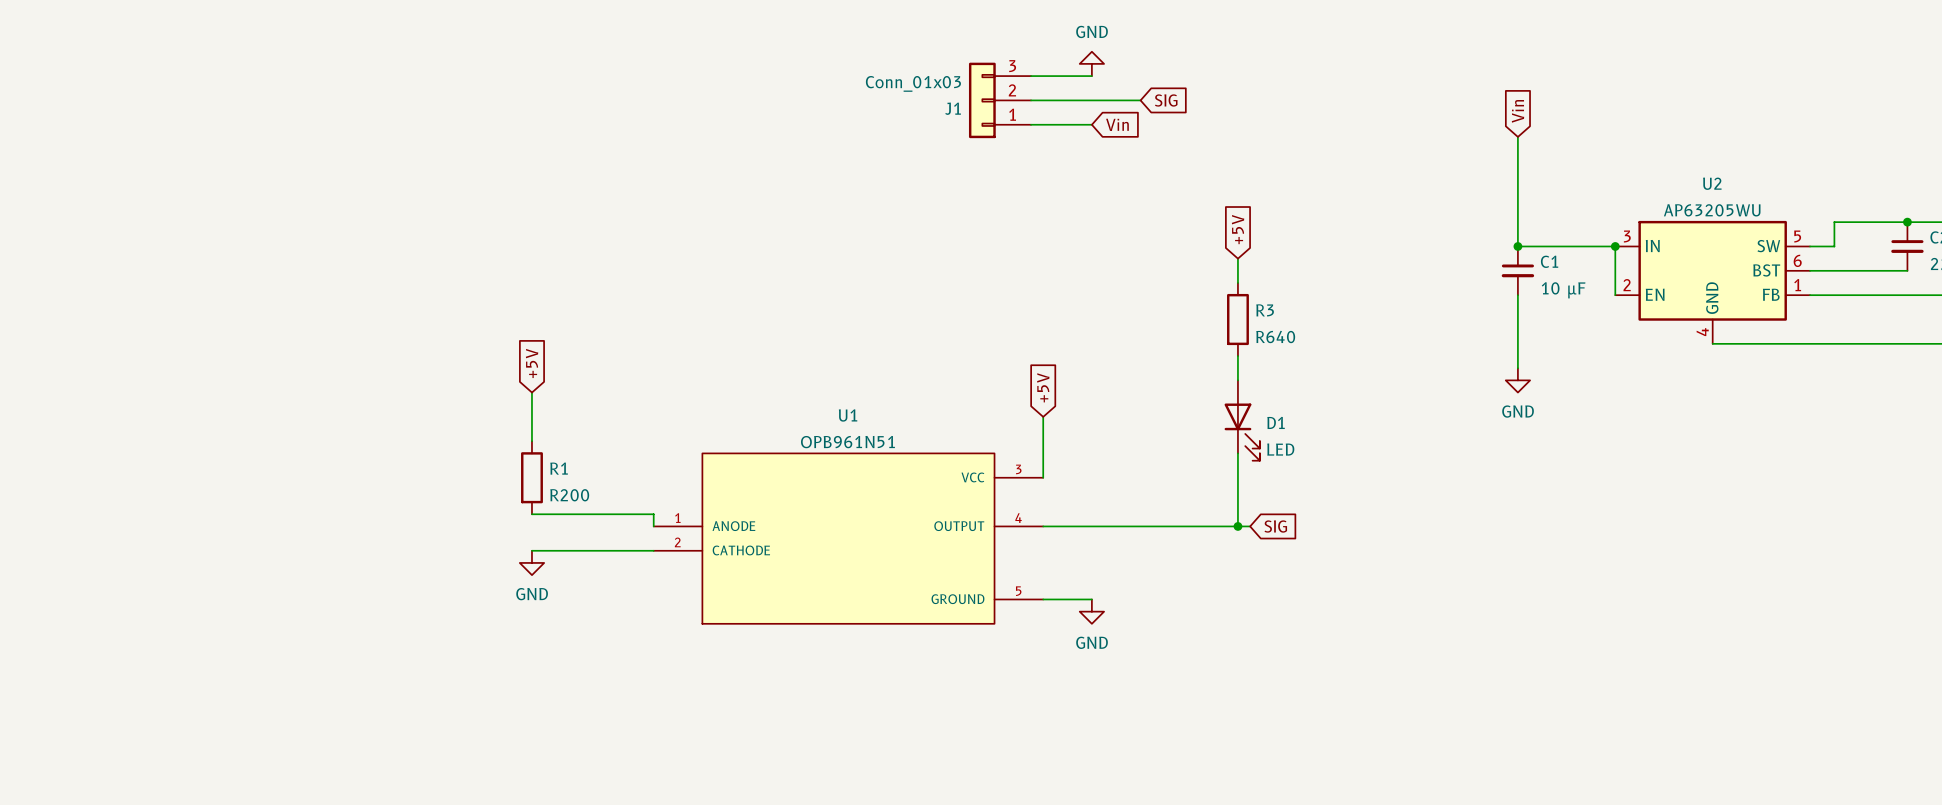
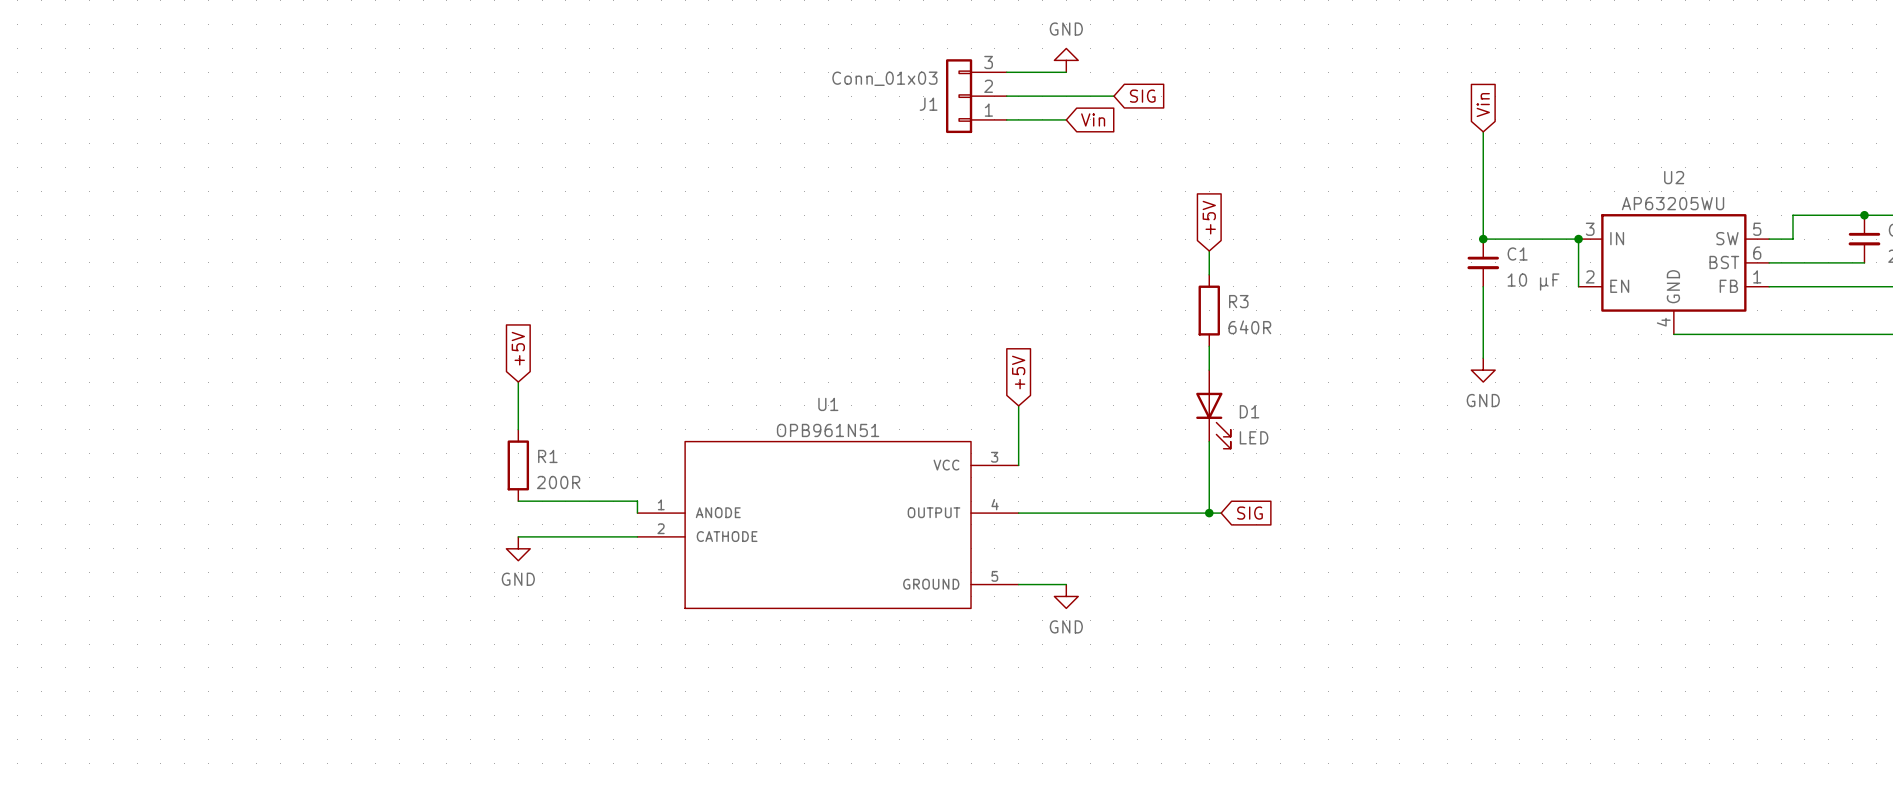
R3 value: R640 (1275, 337) -> 640R (1249, 327)
R1 value: R200 (569, 495) -> 200R (558, 482)

